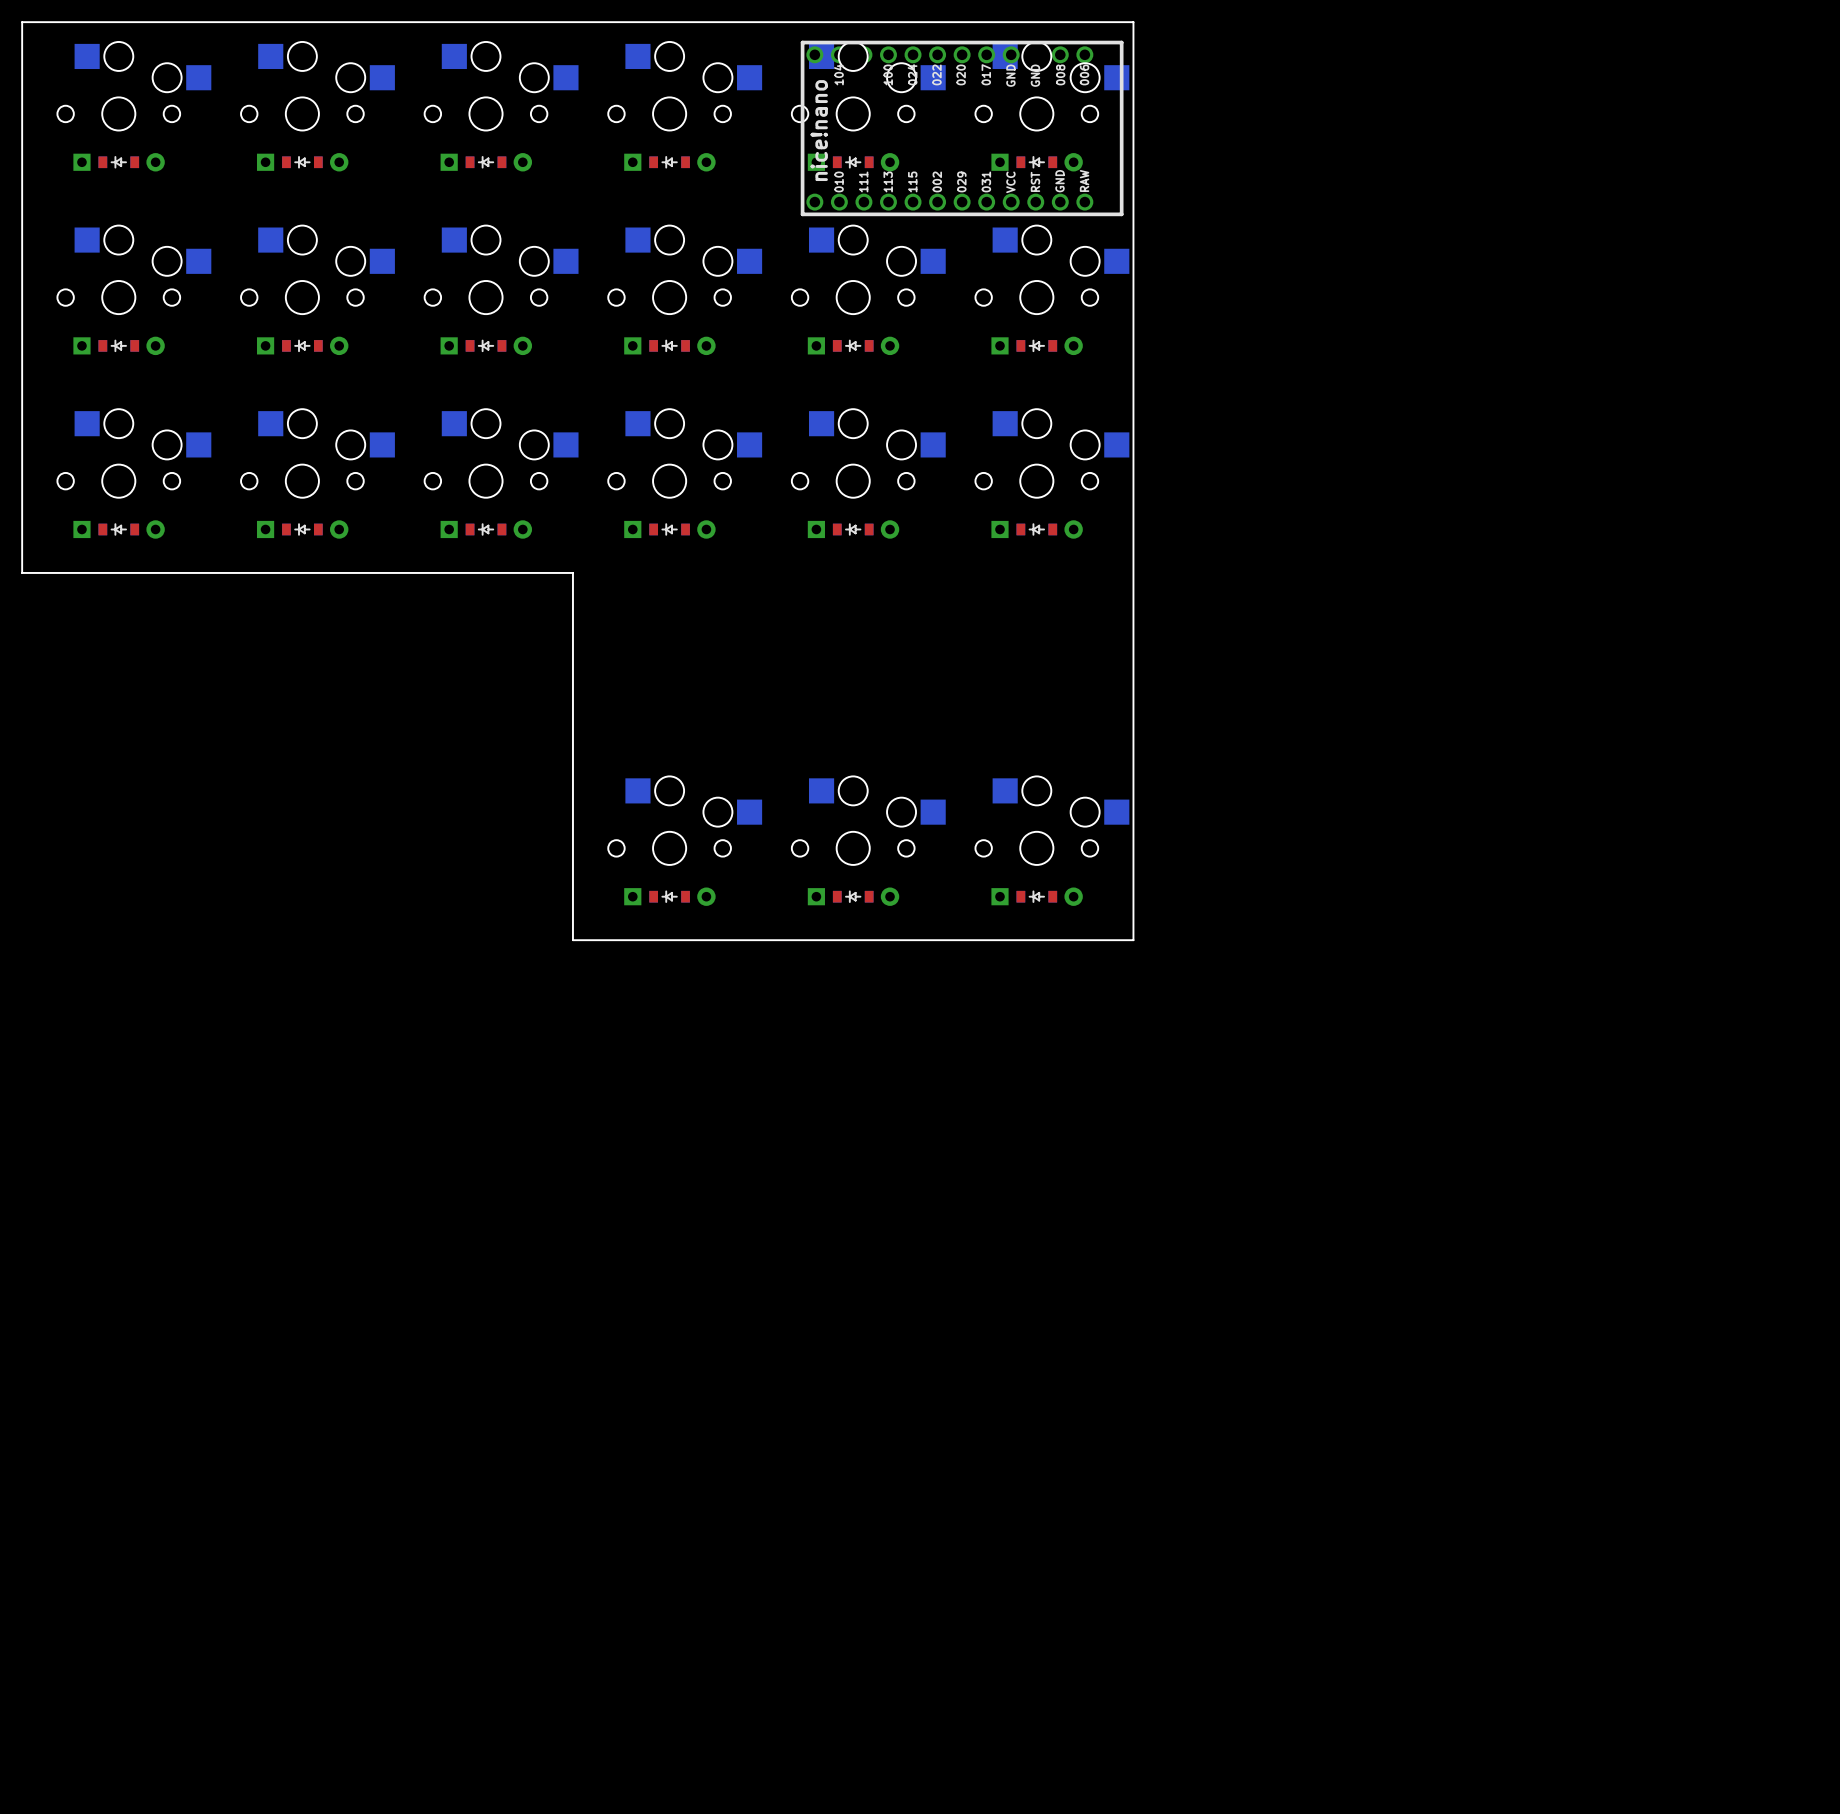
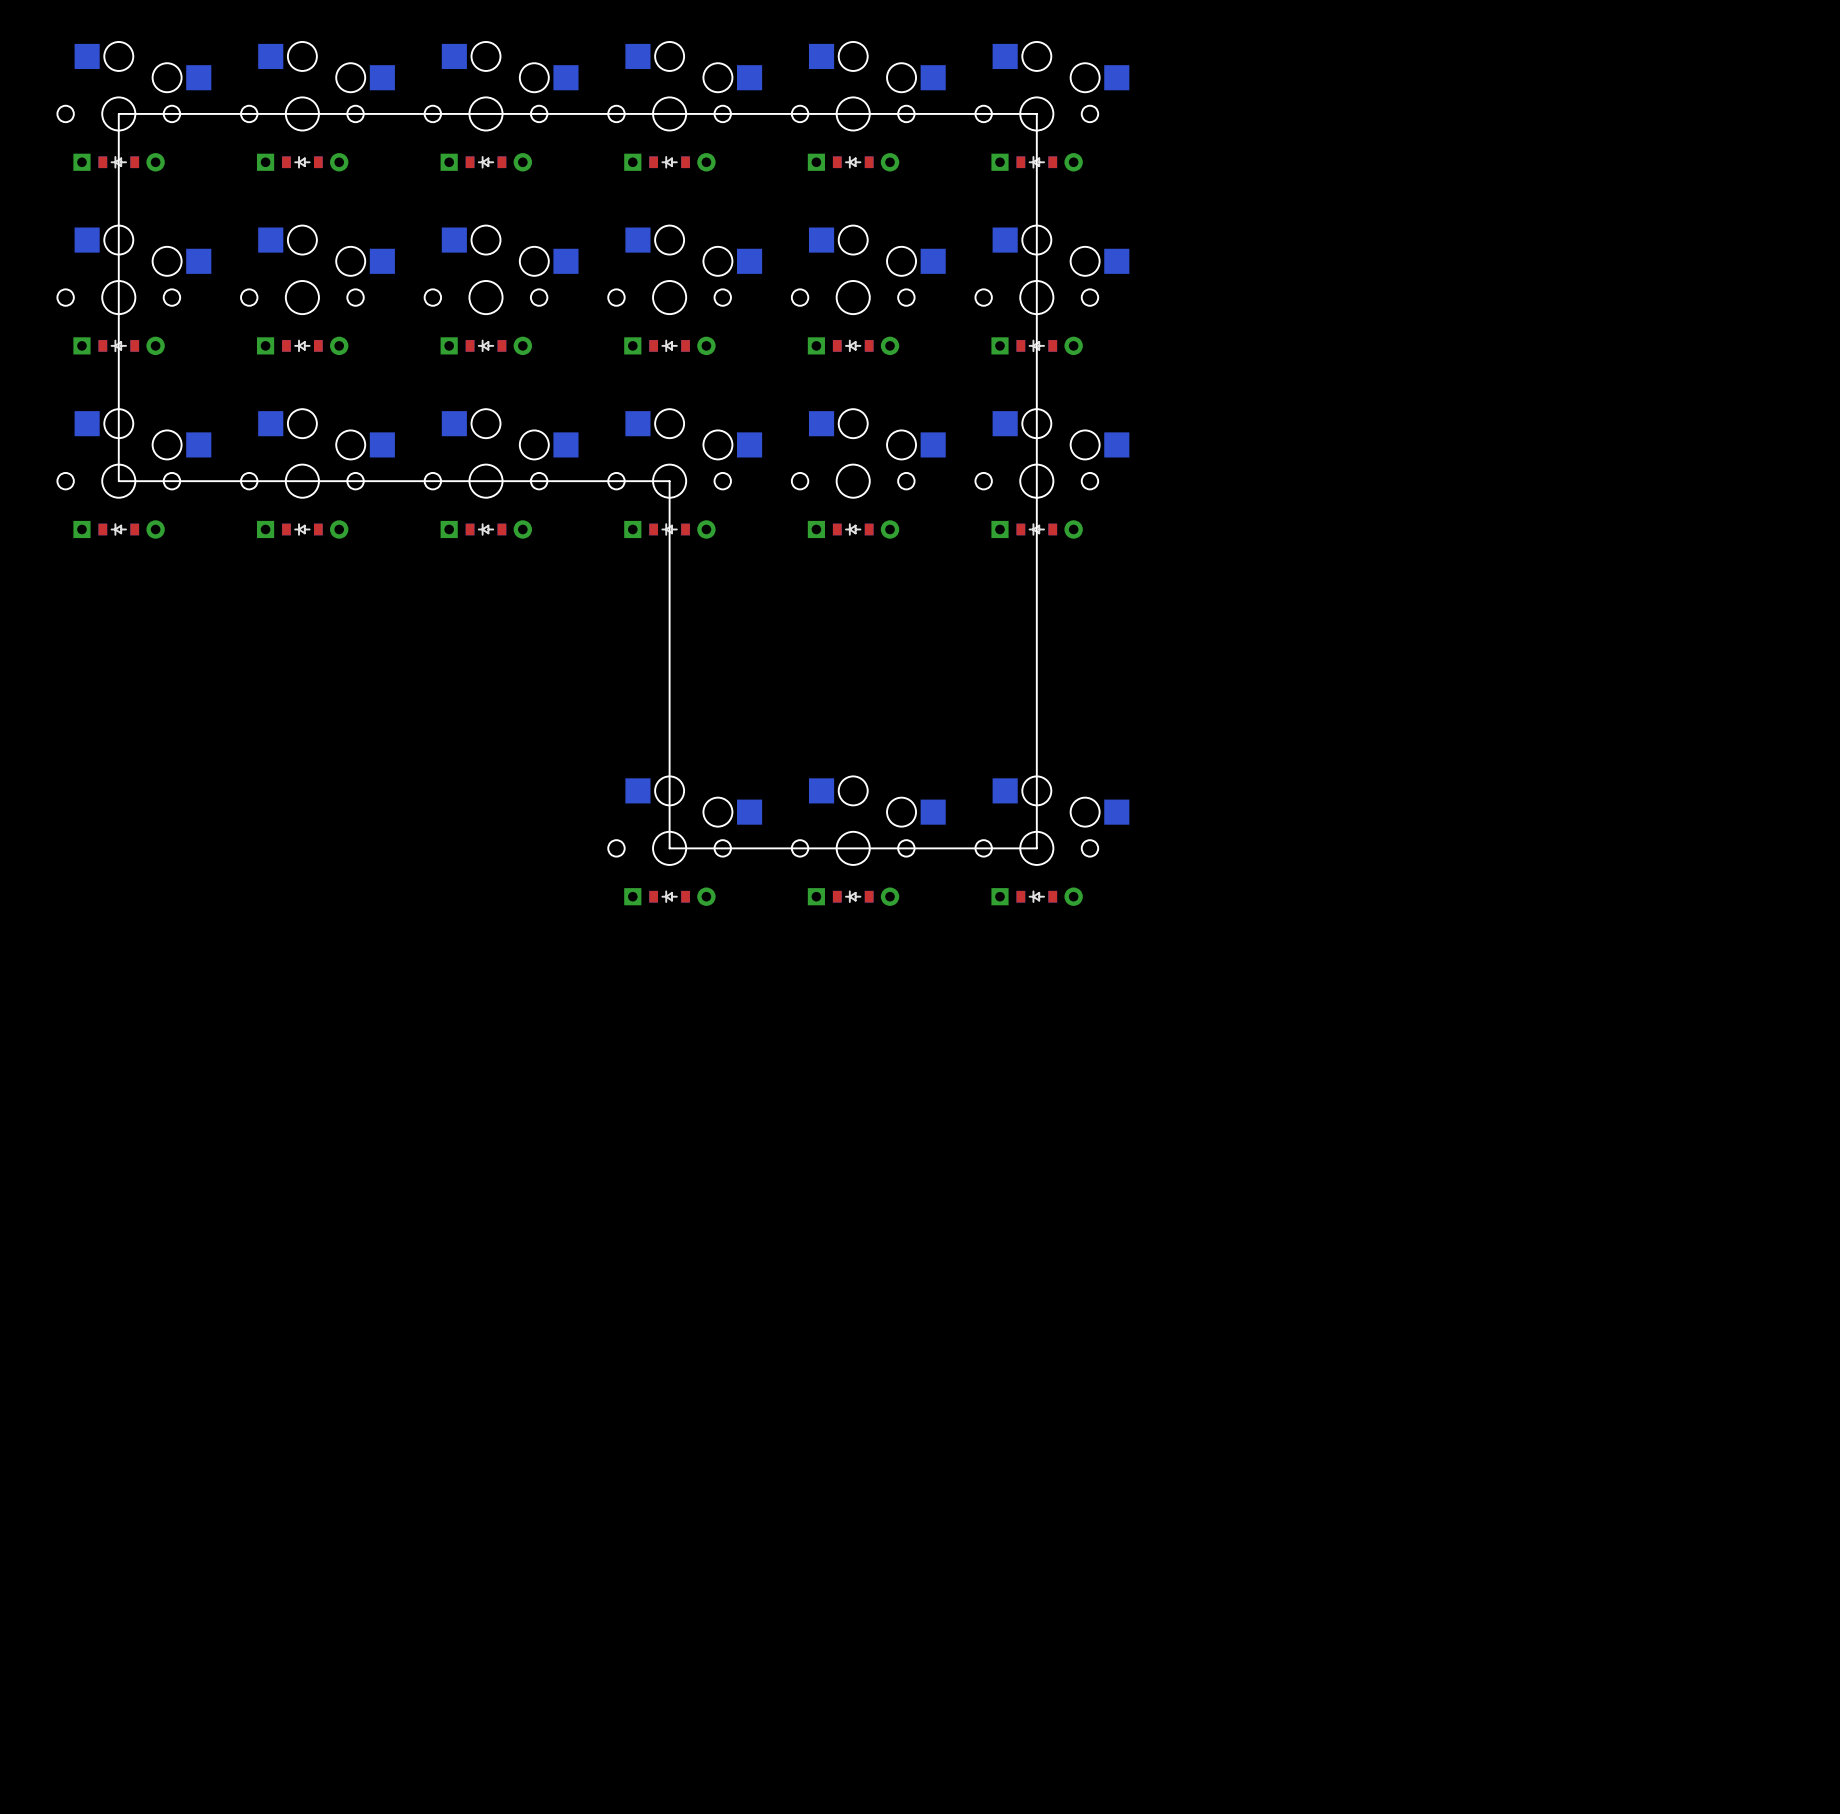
board edge: (22, 22) (1133, 22) (1133, 940) (572, 940) (572, 572) (22, 572) (22, 22) -> (118, 113) (118, 481) (669, 481) (669, 848) (1036, 848) (1036, 113) (118, 113)
part: (962, 128) -> none

